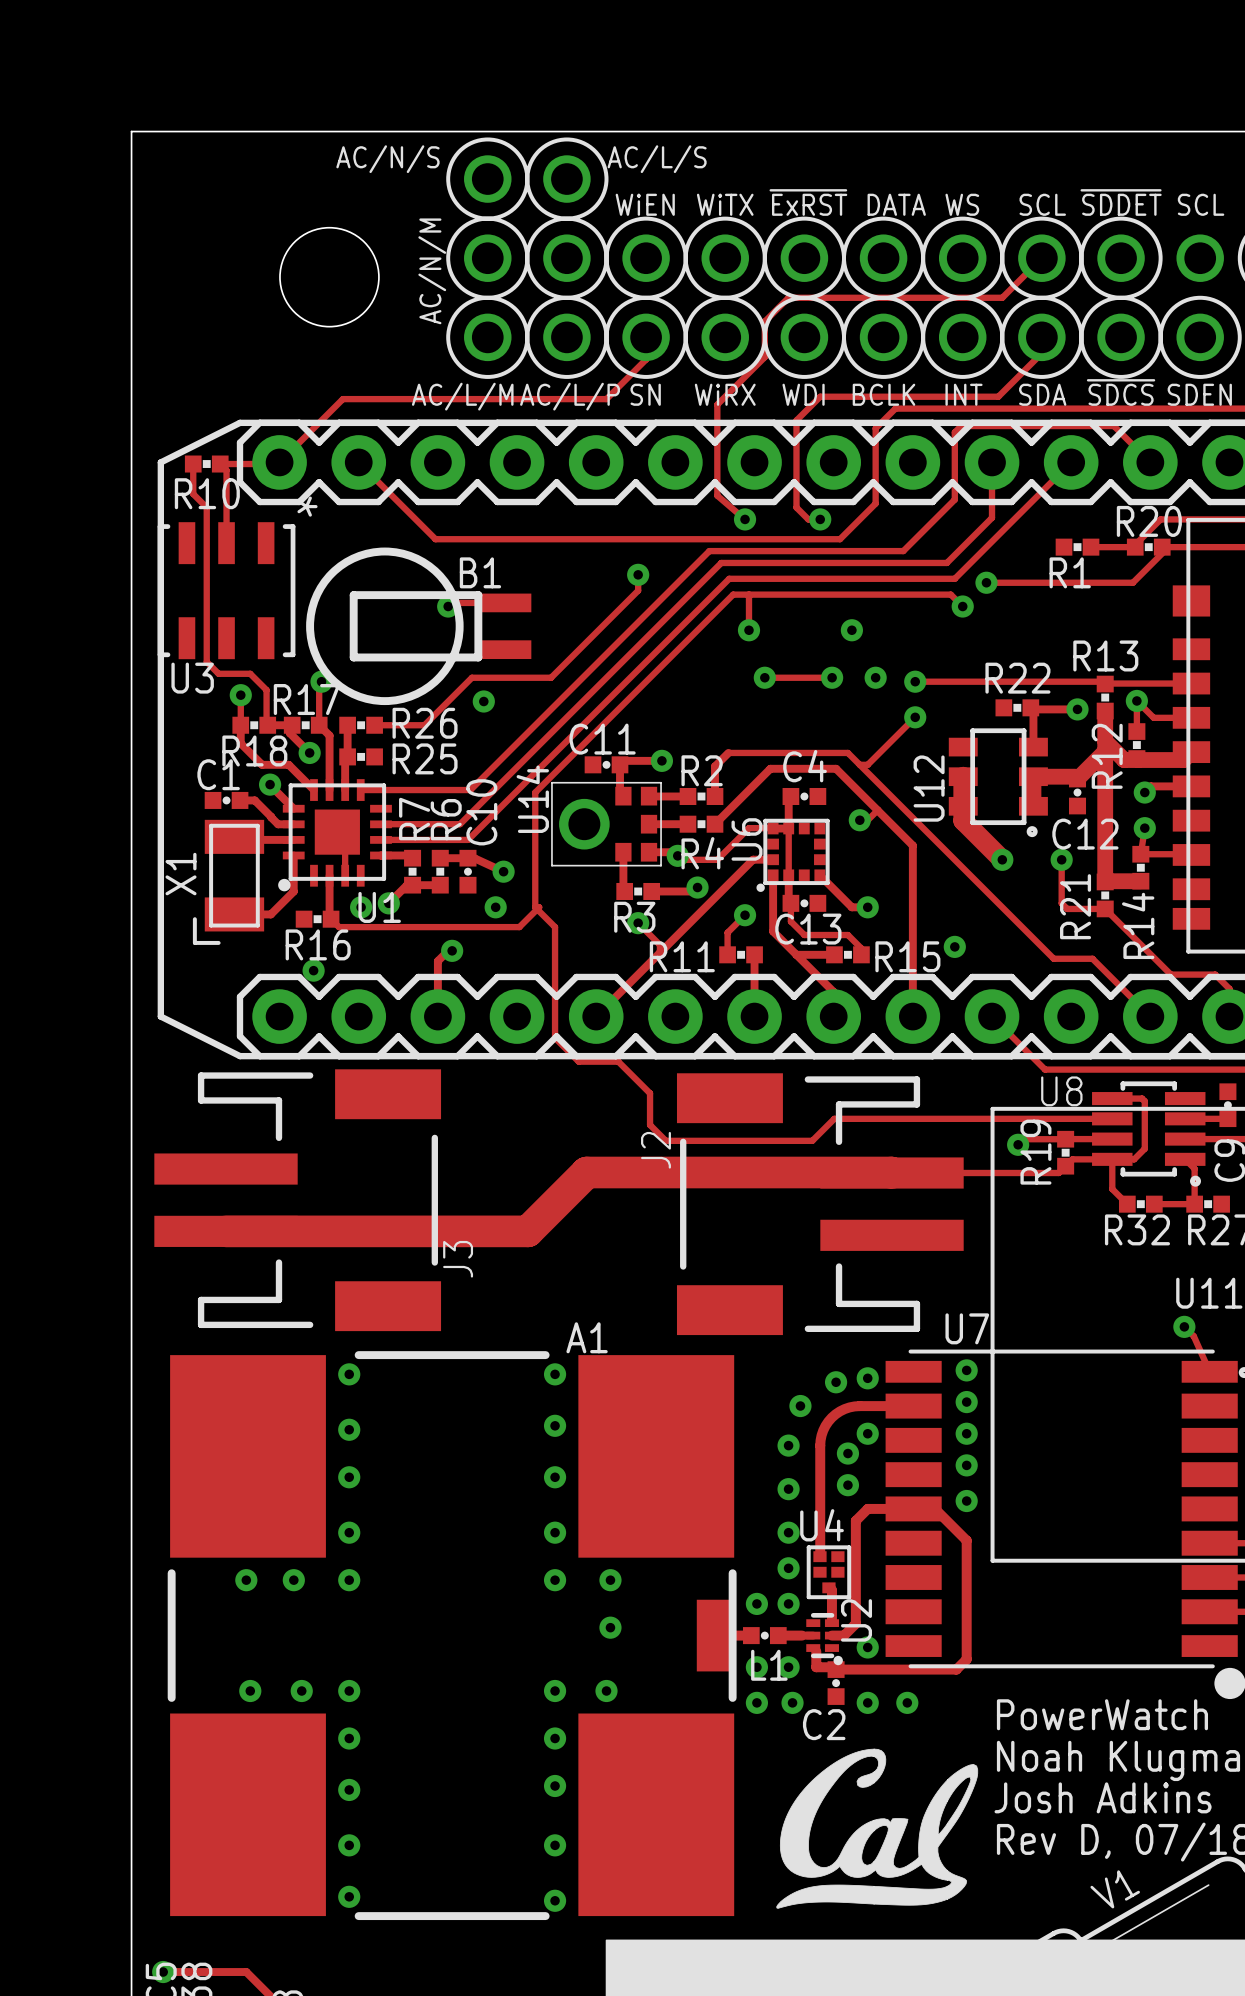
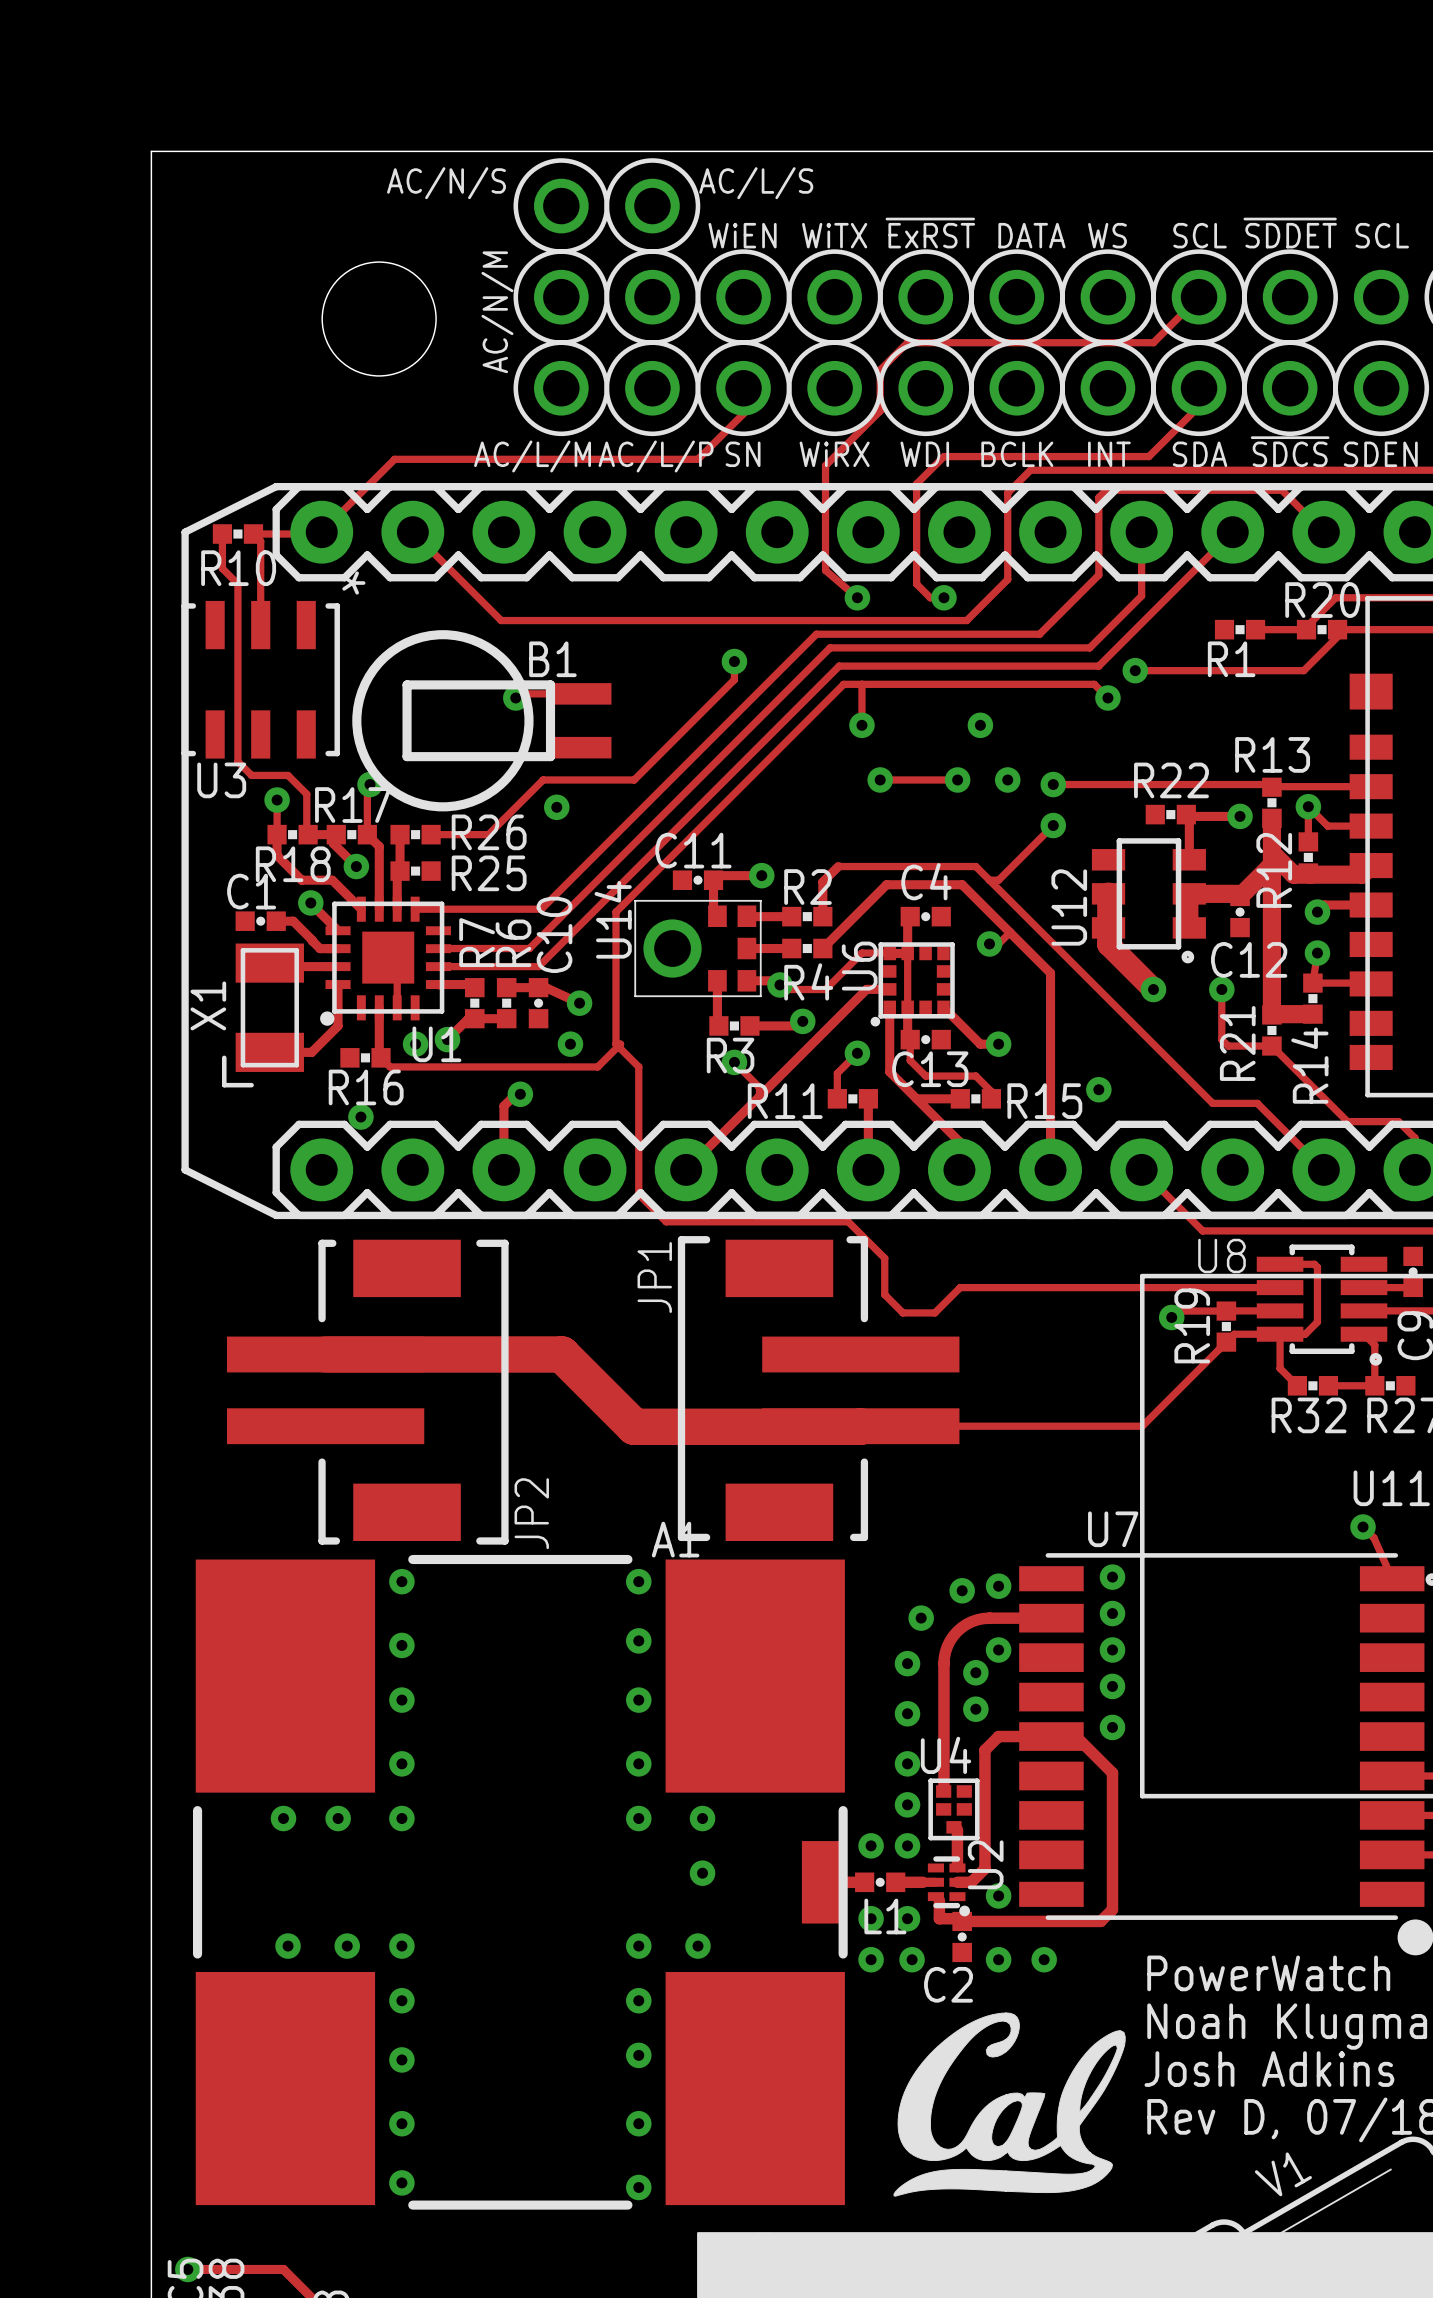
track: (618, 1061) (650, 1093) (650, 1125) (665, 1140) (784, 1140) -> (711, 1221) (848, 1221) (884, 1258) (884, 1294) (902, 1312)
track: (1058, 1173) (586, 1172) (527, 1231) (226, 1231) -> (1218, 1349) (1142, 1426) (634, 1426) (561, 1354) (325, 1354)
J3: (297, 1200) -> none
J2: (820, 1204) -> none
JP1: none -> (818, 1388)
JP2: none -> (367, 1392)

